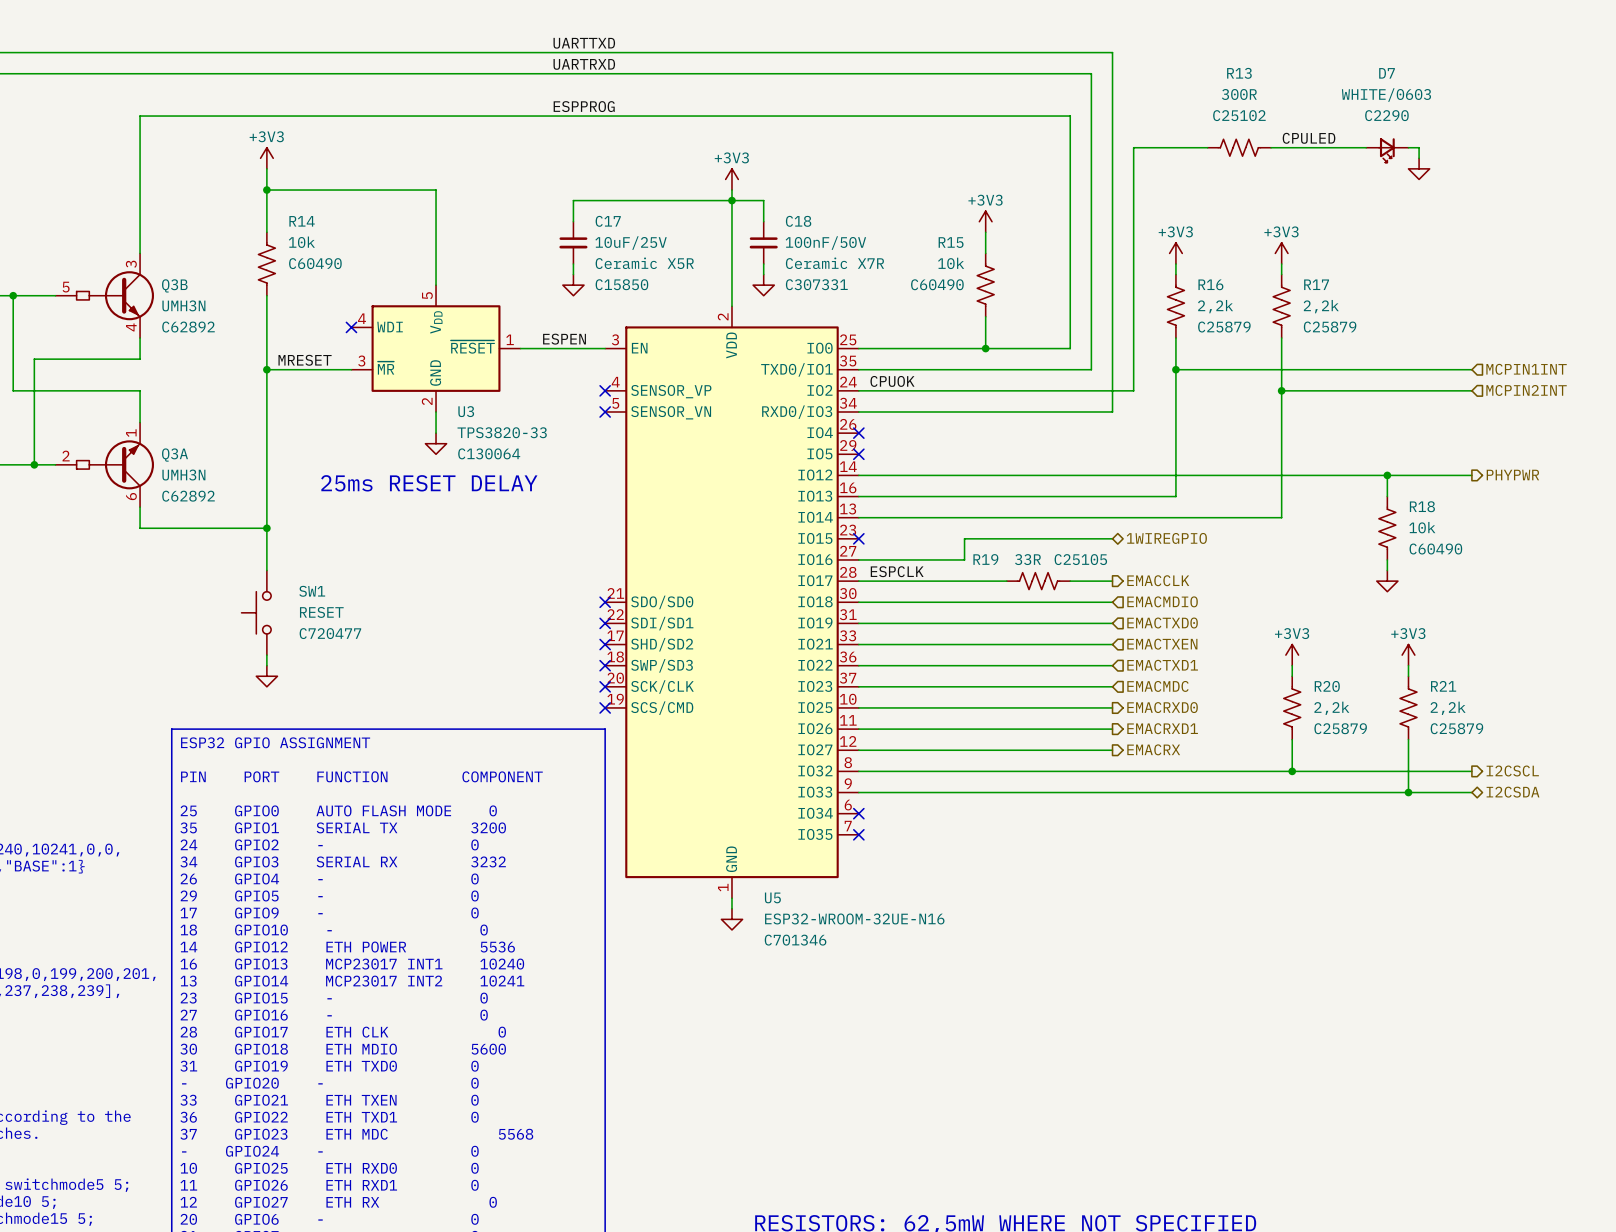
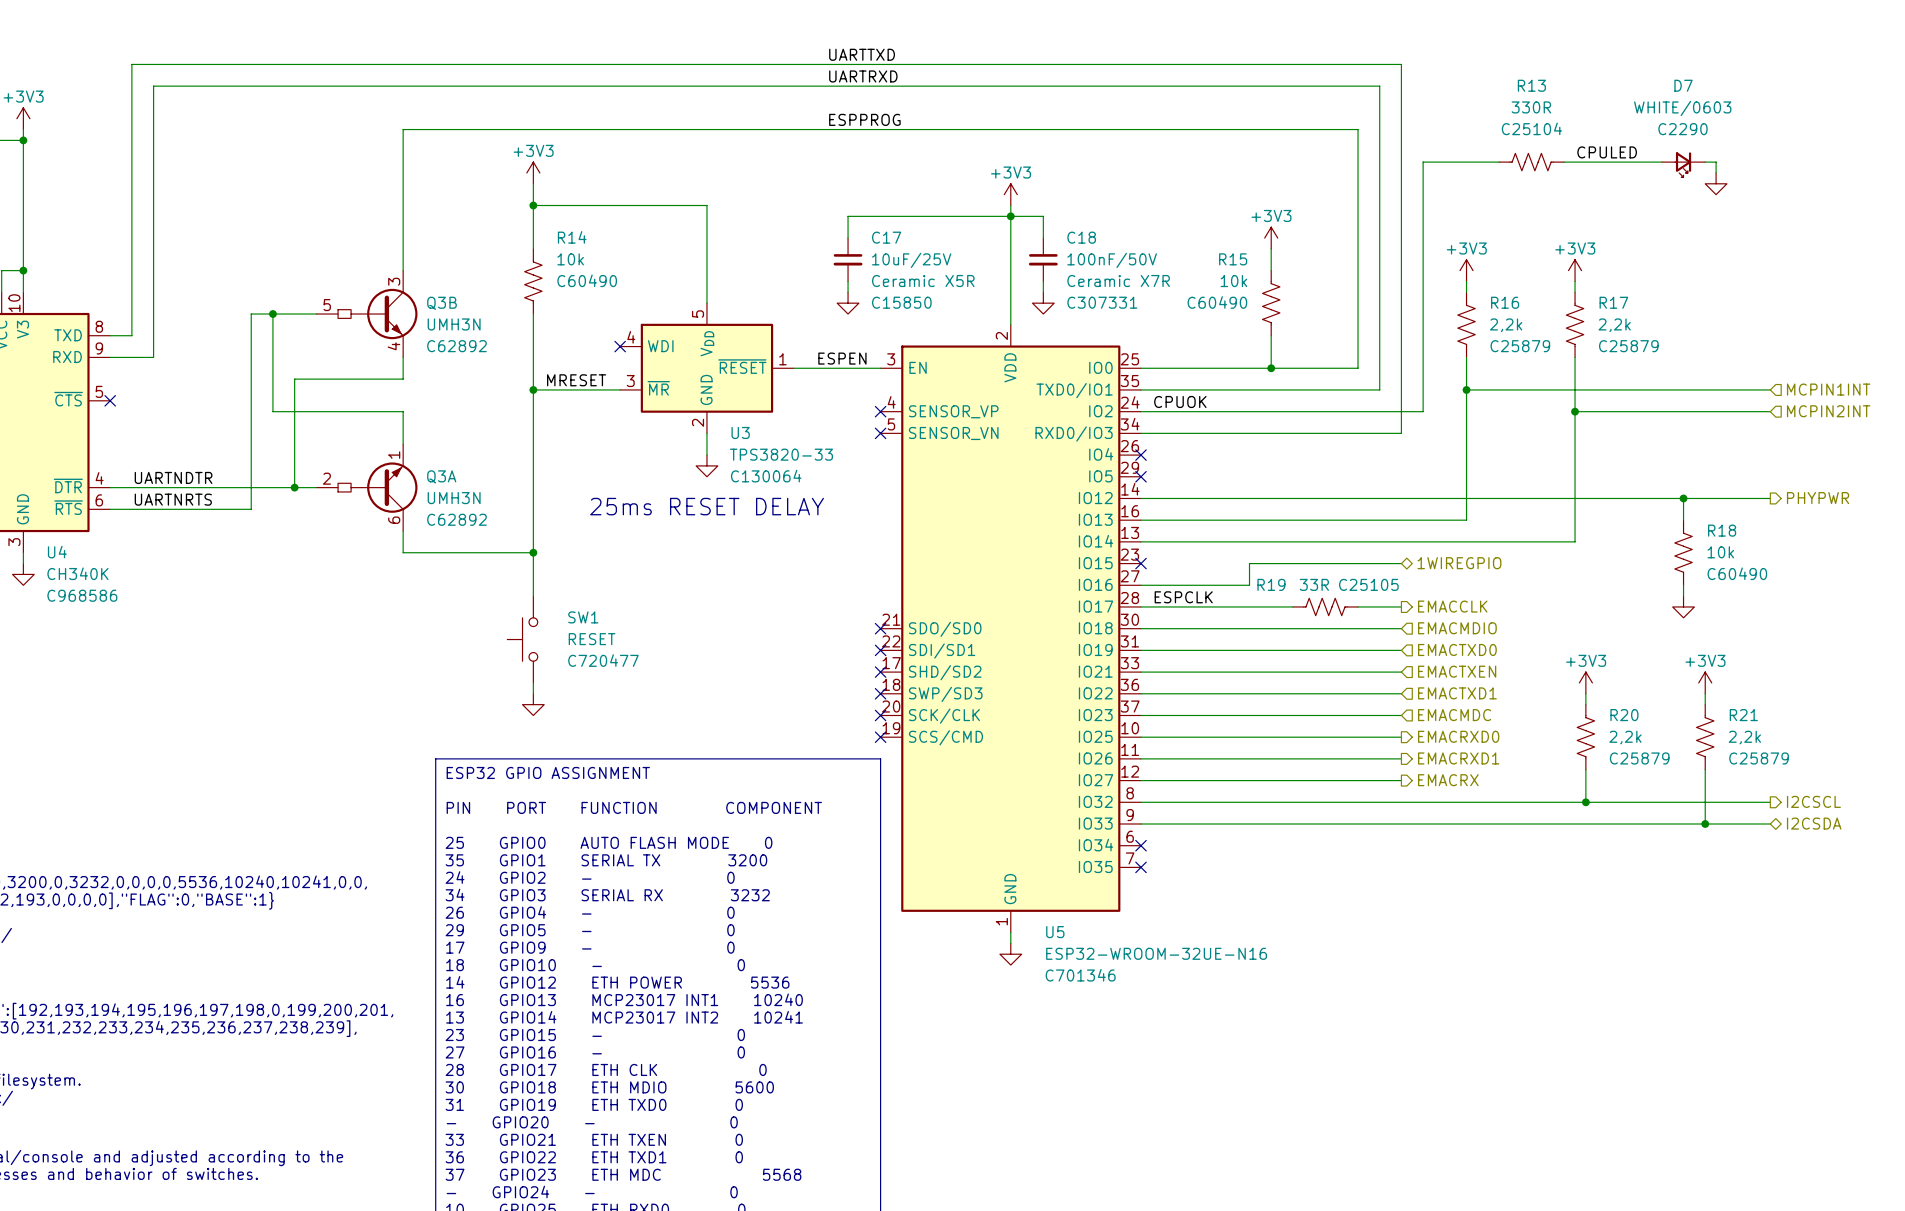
R13 value: 300R (1239, 94) -> 330R (1531, 107)
R13 text: C25102 (1239, 115) -> C25104 (1531, 128)

